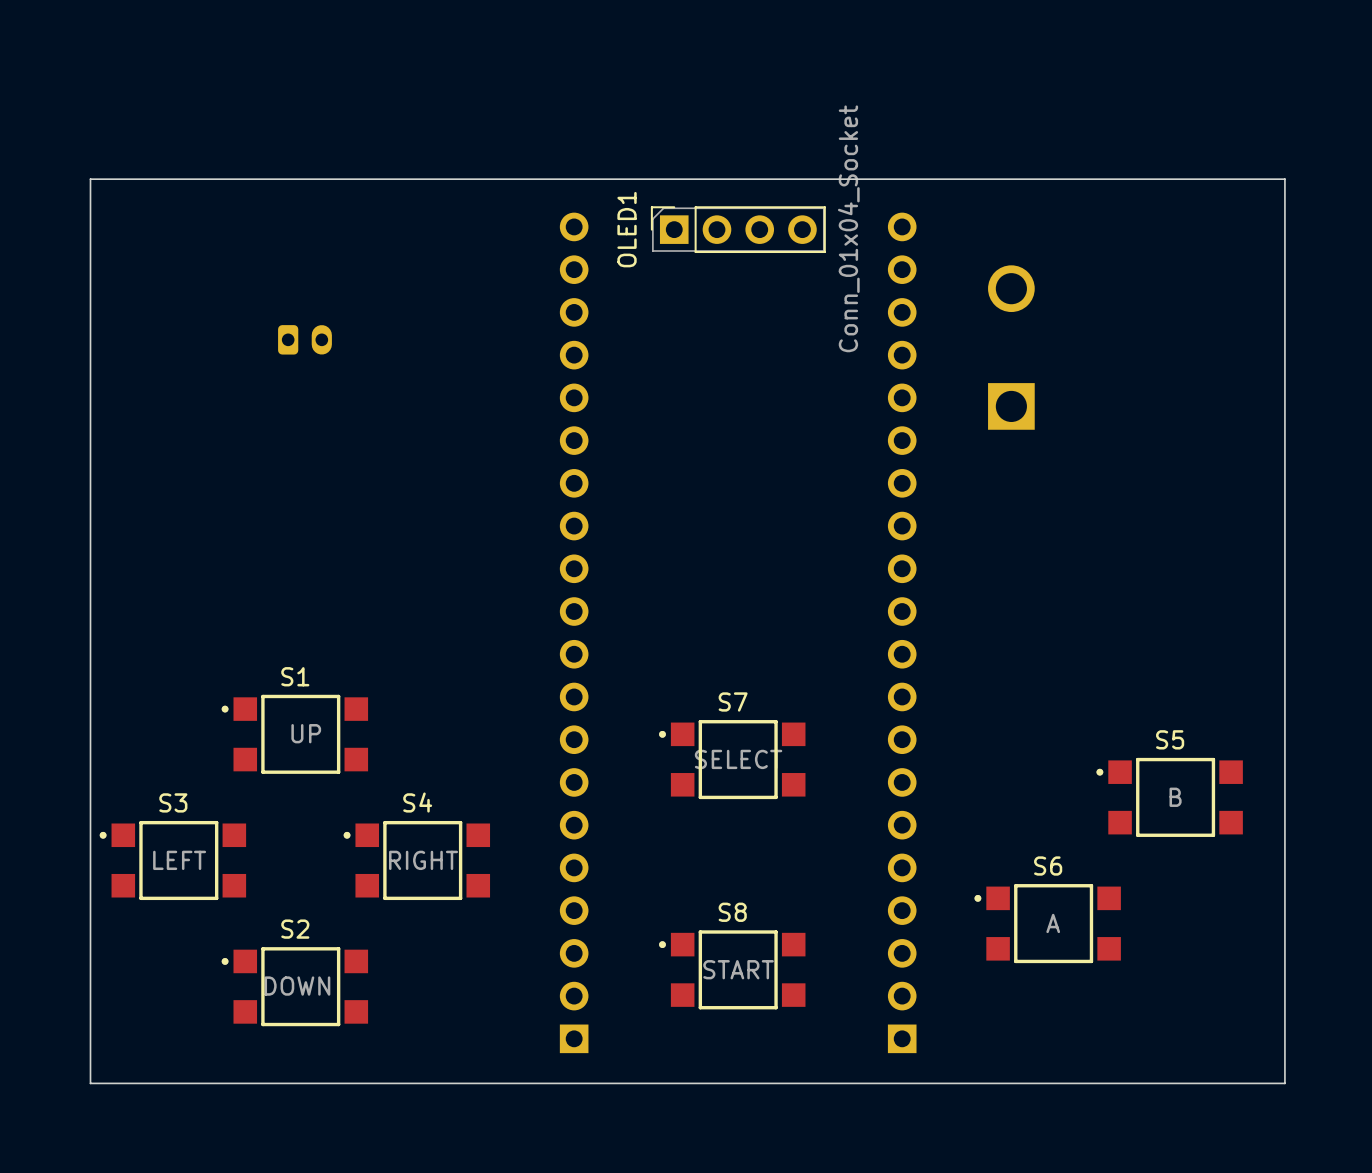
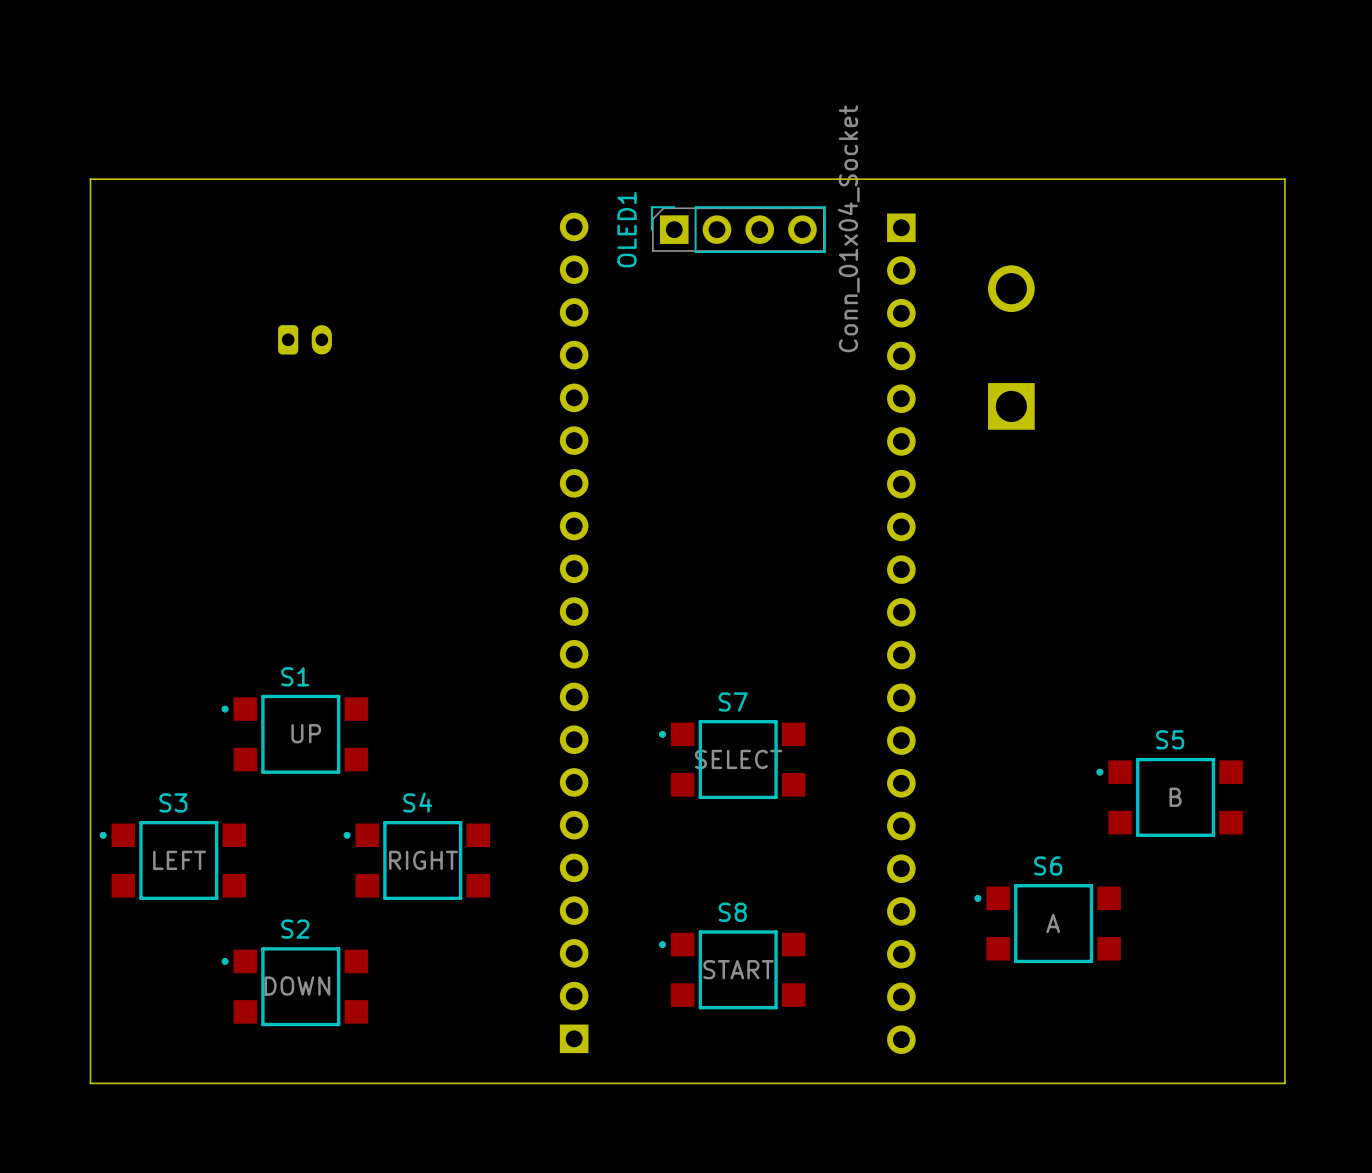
part rotation: 0° (902, 632) -> 180° (901, 633)

